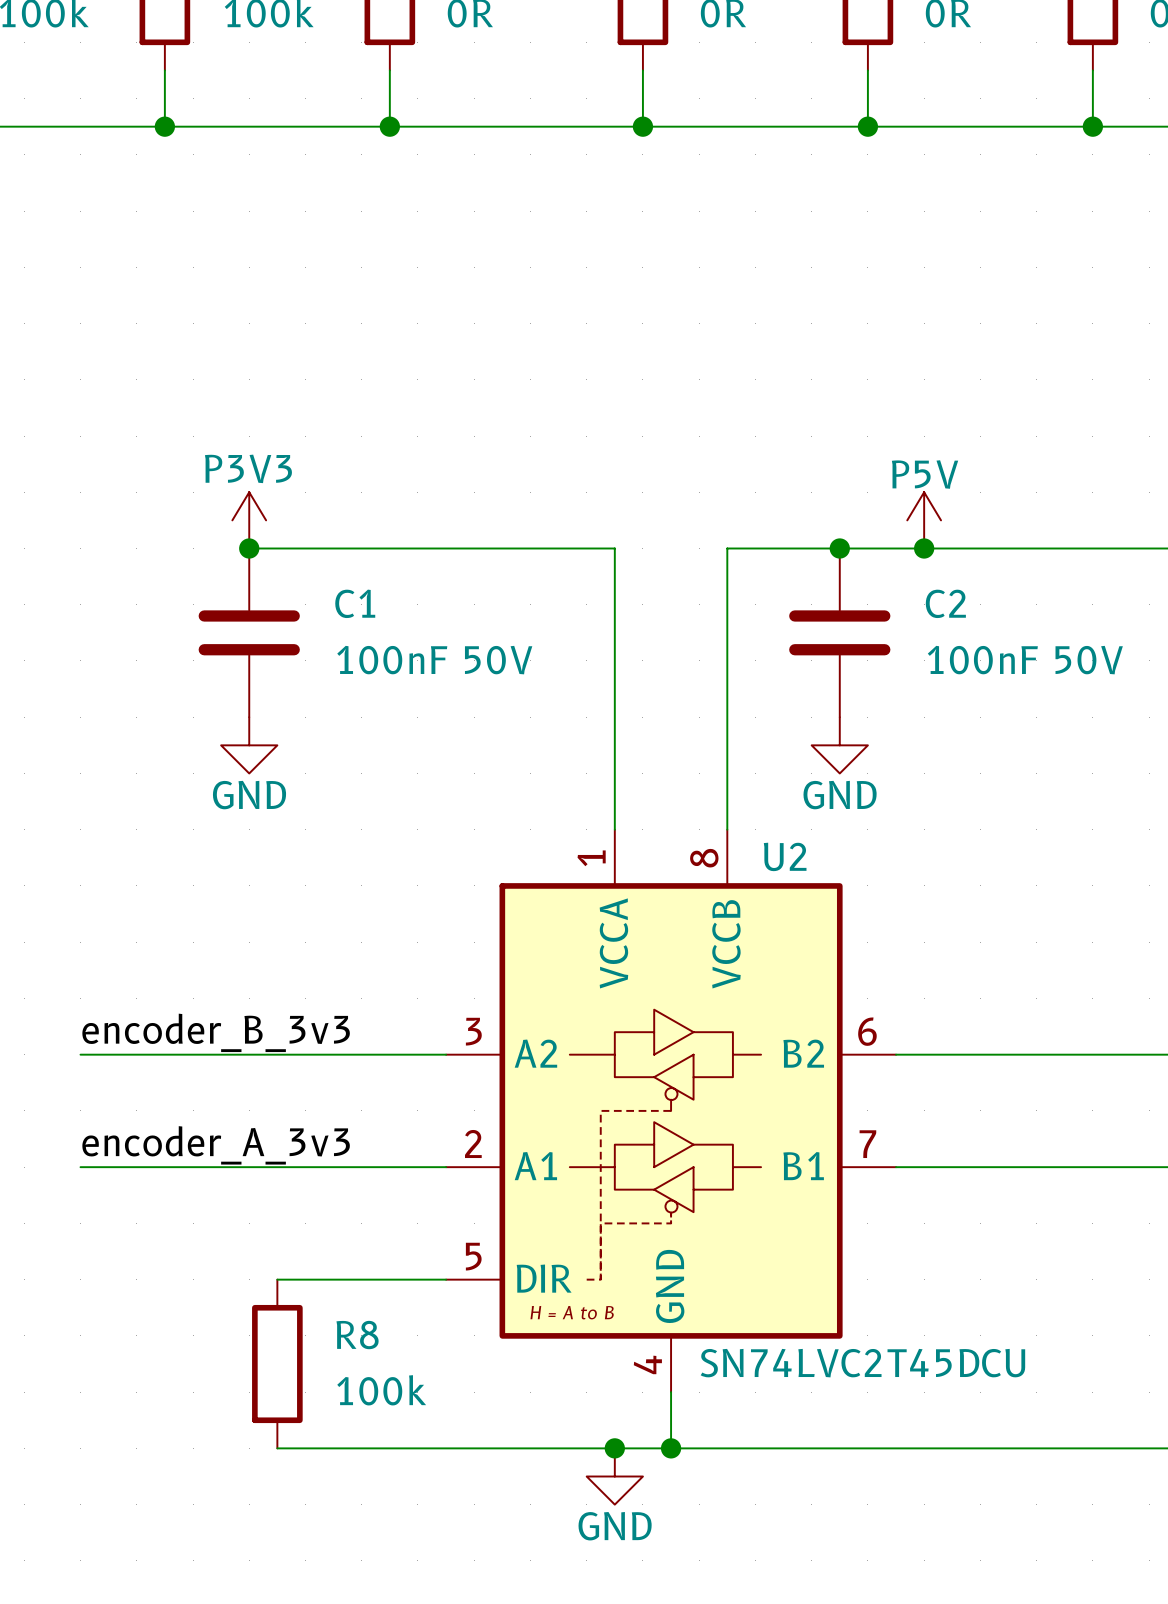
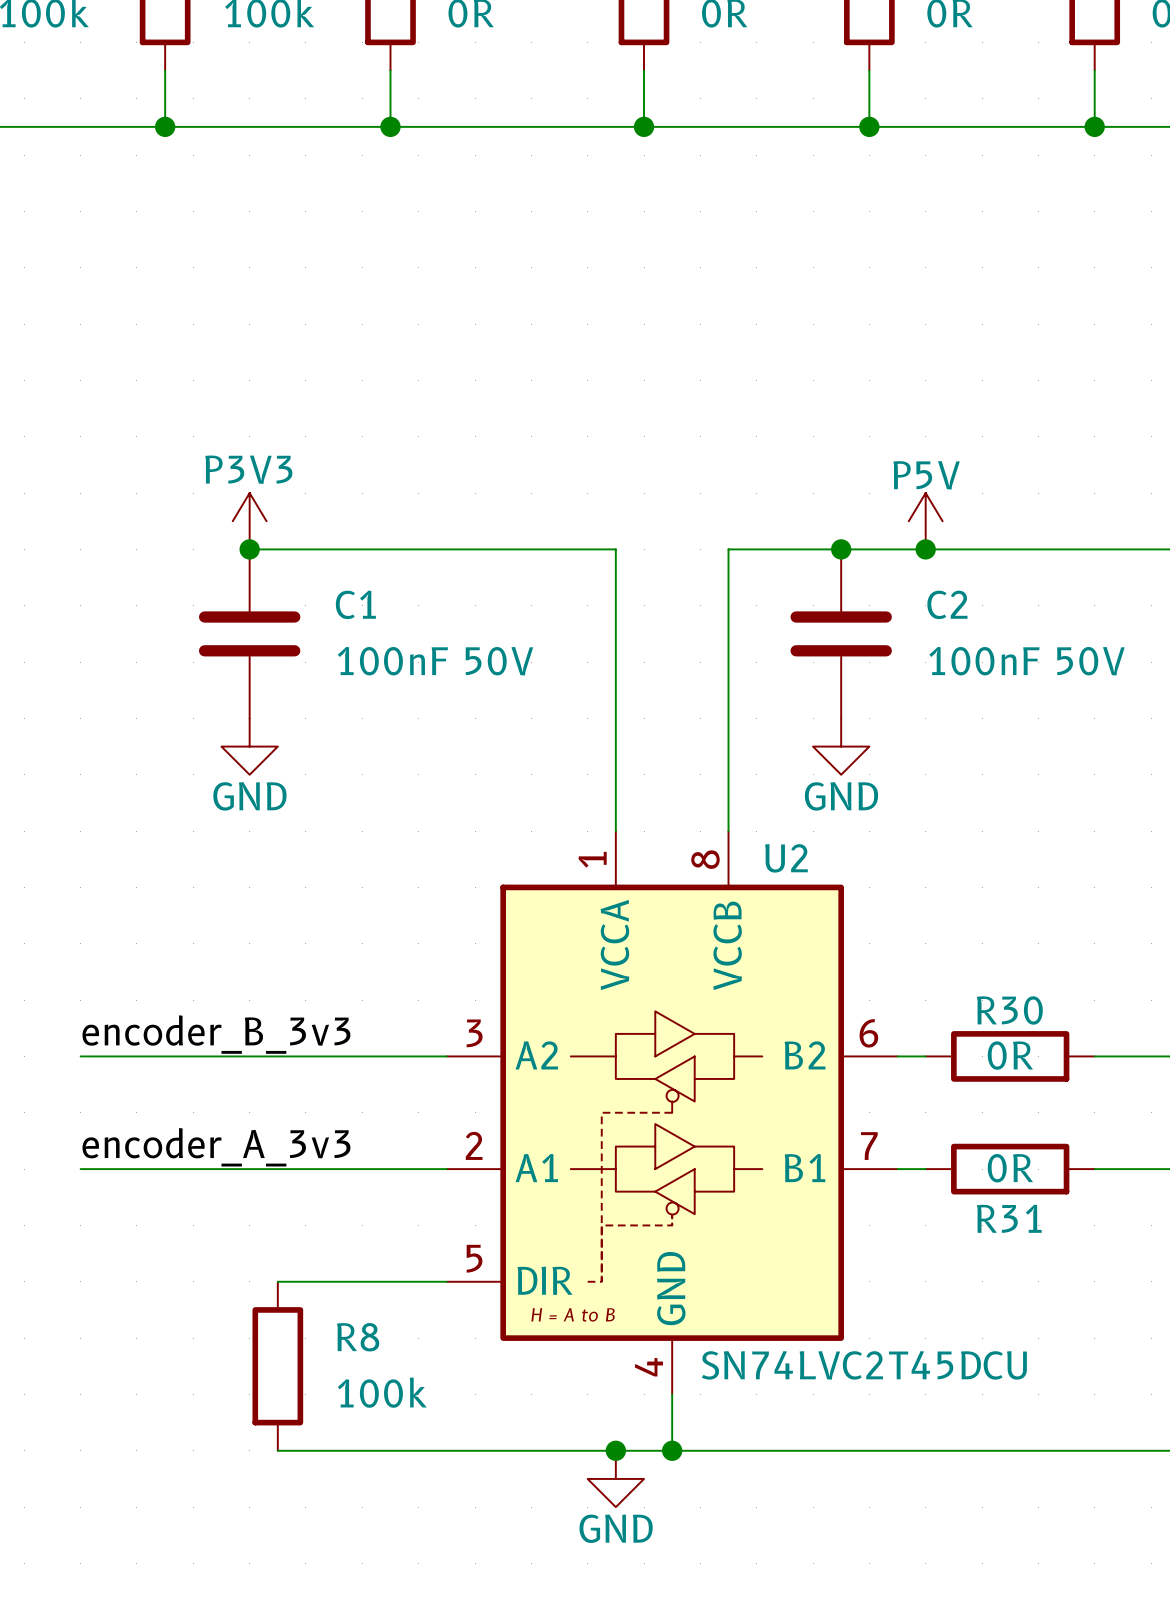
wire: (924, 1054) (1092, 1054) -> none
R30: none -> 0R (1010, 1056)
wire: (924, 1167) (1092, 1167) -> none
R31: none -> 0R (1010, 1169)

